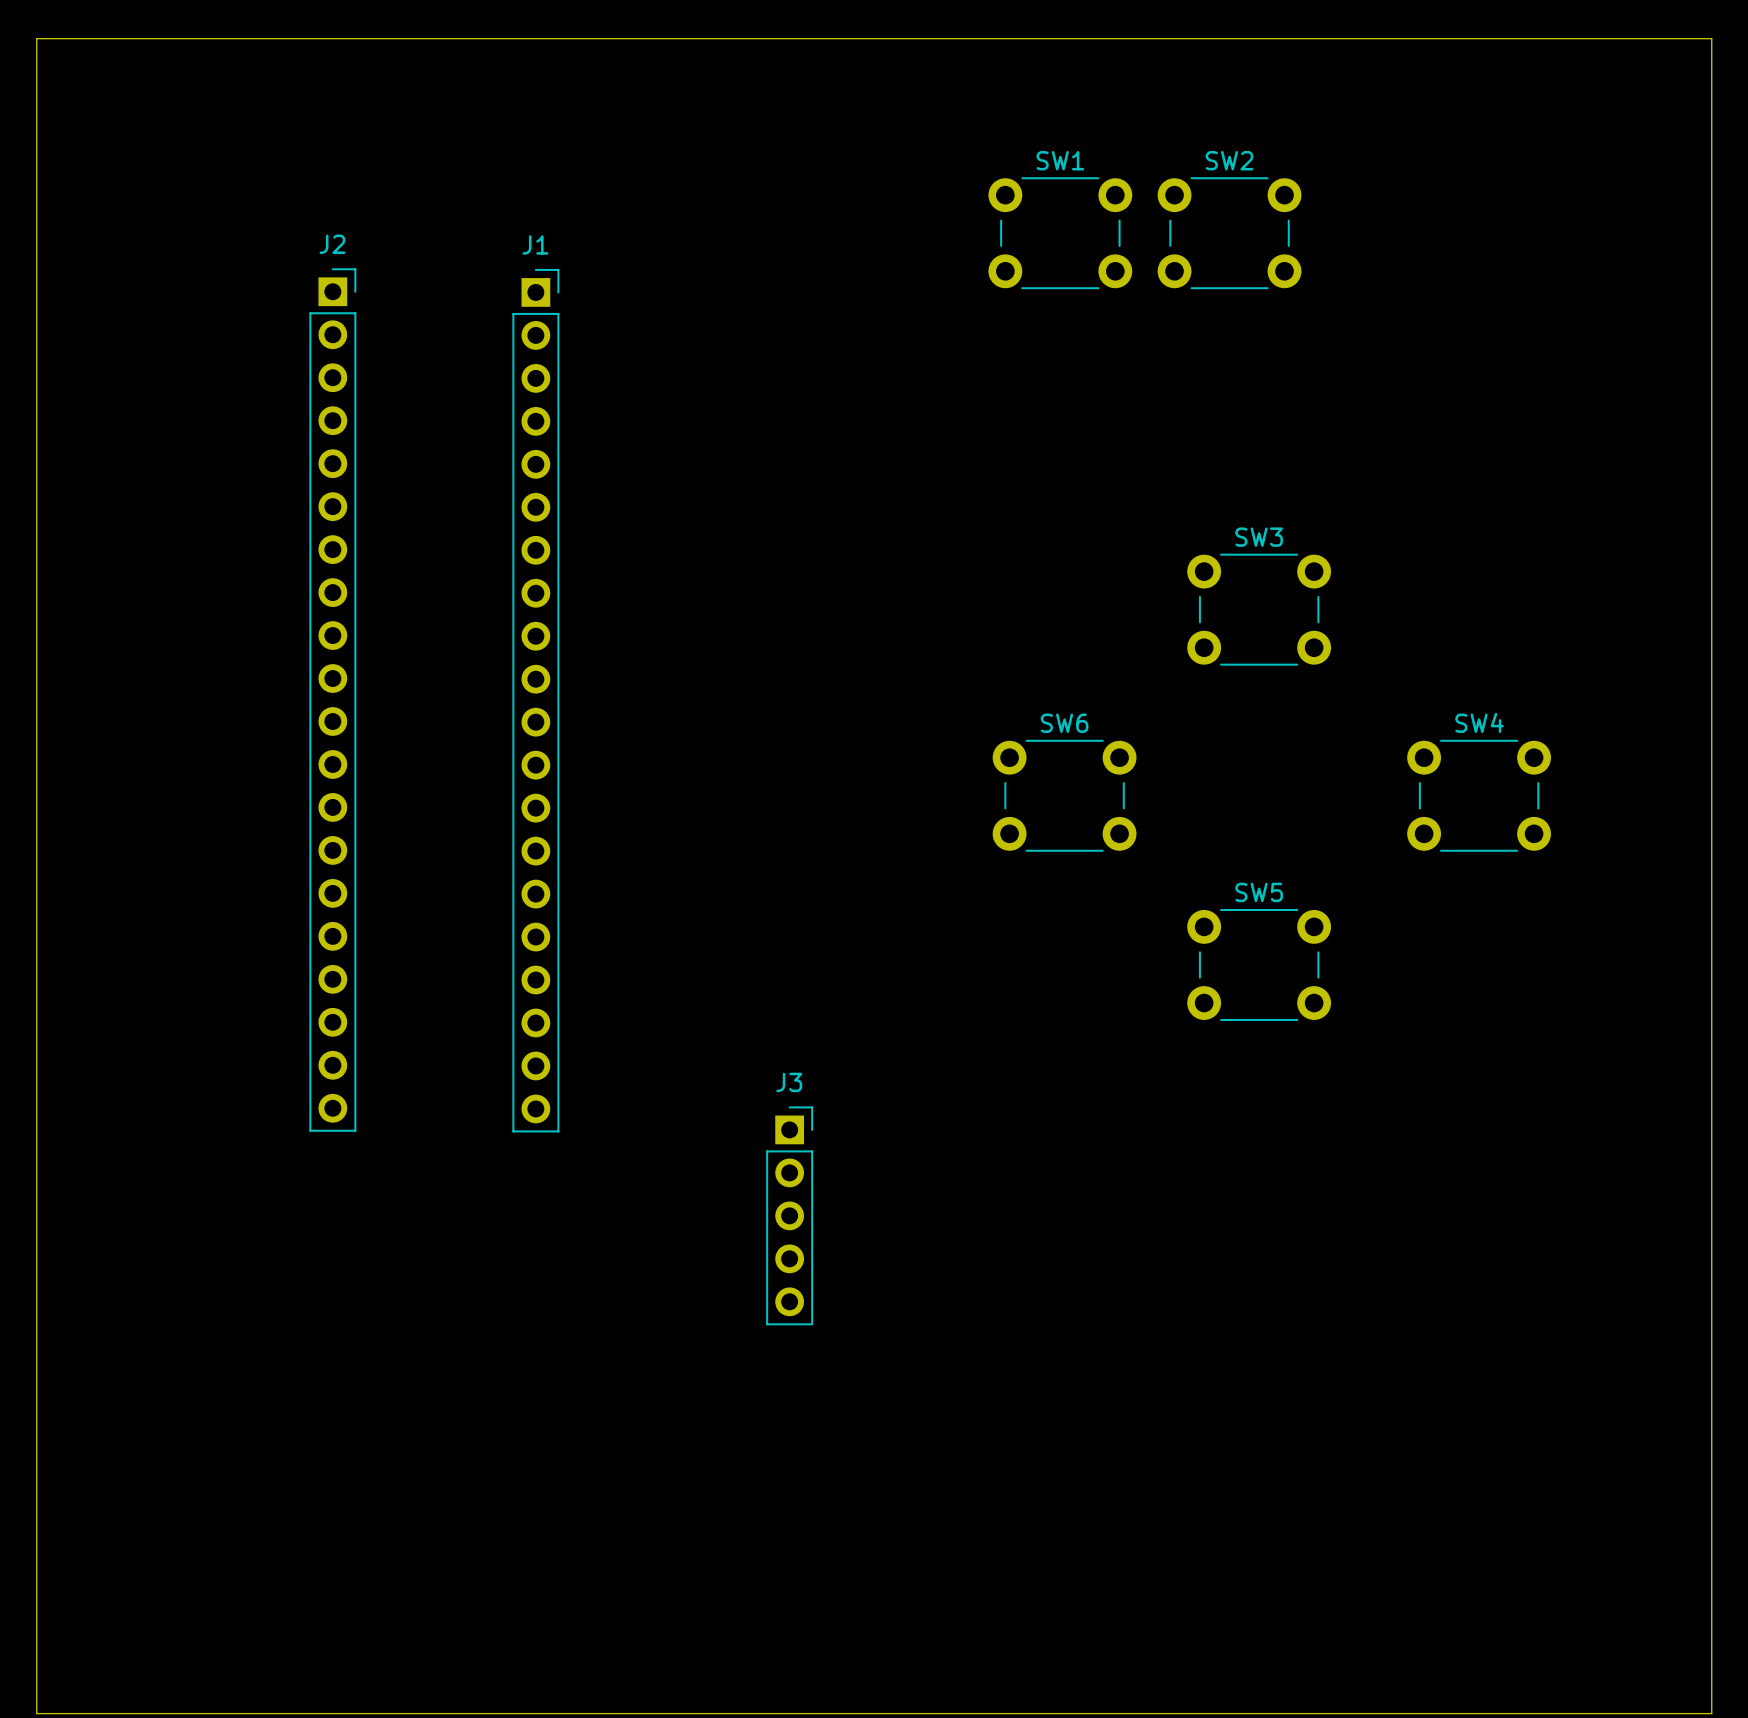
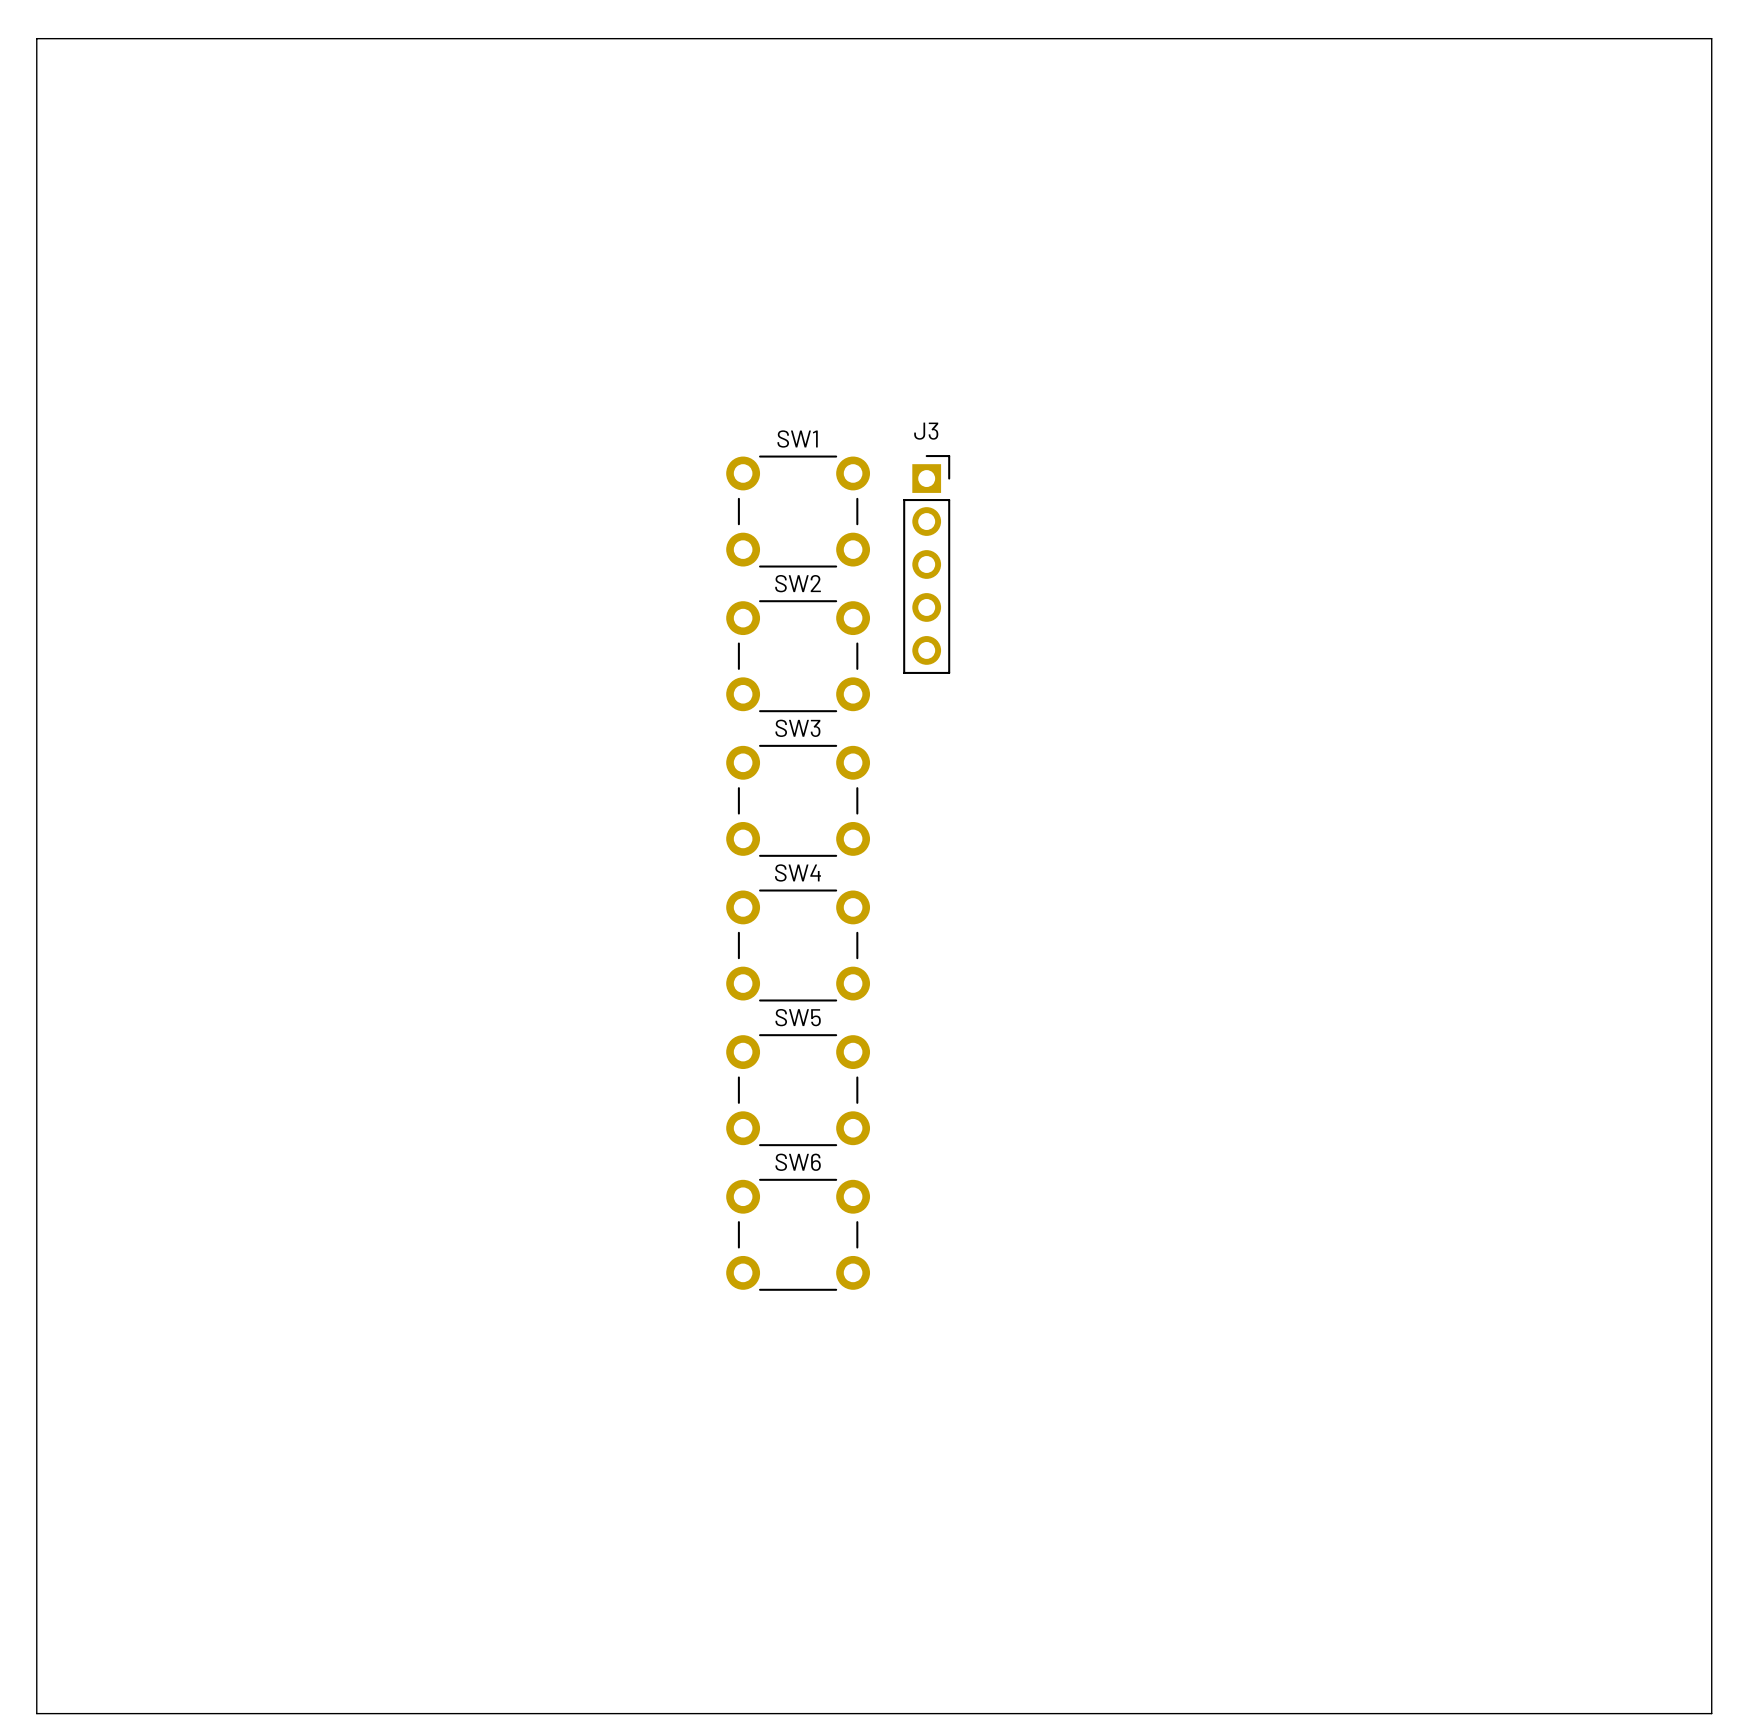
SW1 position: (1060, 233) -> (798, 511)
SW2 position: (1229, 233) -> (798, 656)
SW3 position: (1259, 609) -> (798, 800)
J2: (332, 700) -> none
J1: (535, 700) -> none
SW6 position: (1064, 795) -> (798, 1234)
SW4 position: (1479, 795) -> (798, 945)
SW5 position: (1259, 964) -> (798, 1090)
J3 position: (789, 1215) -> (926, 564)

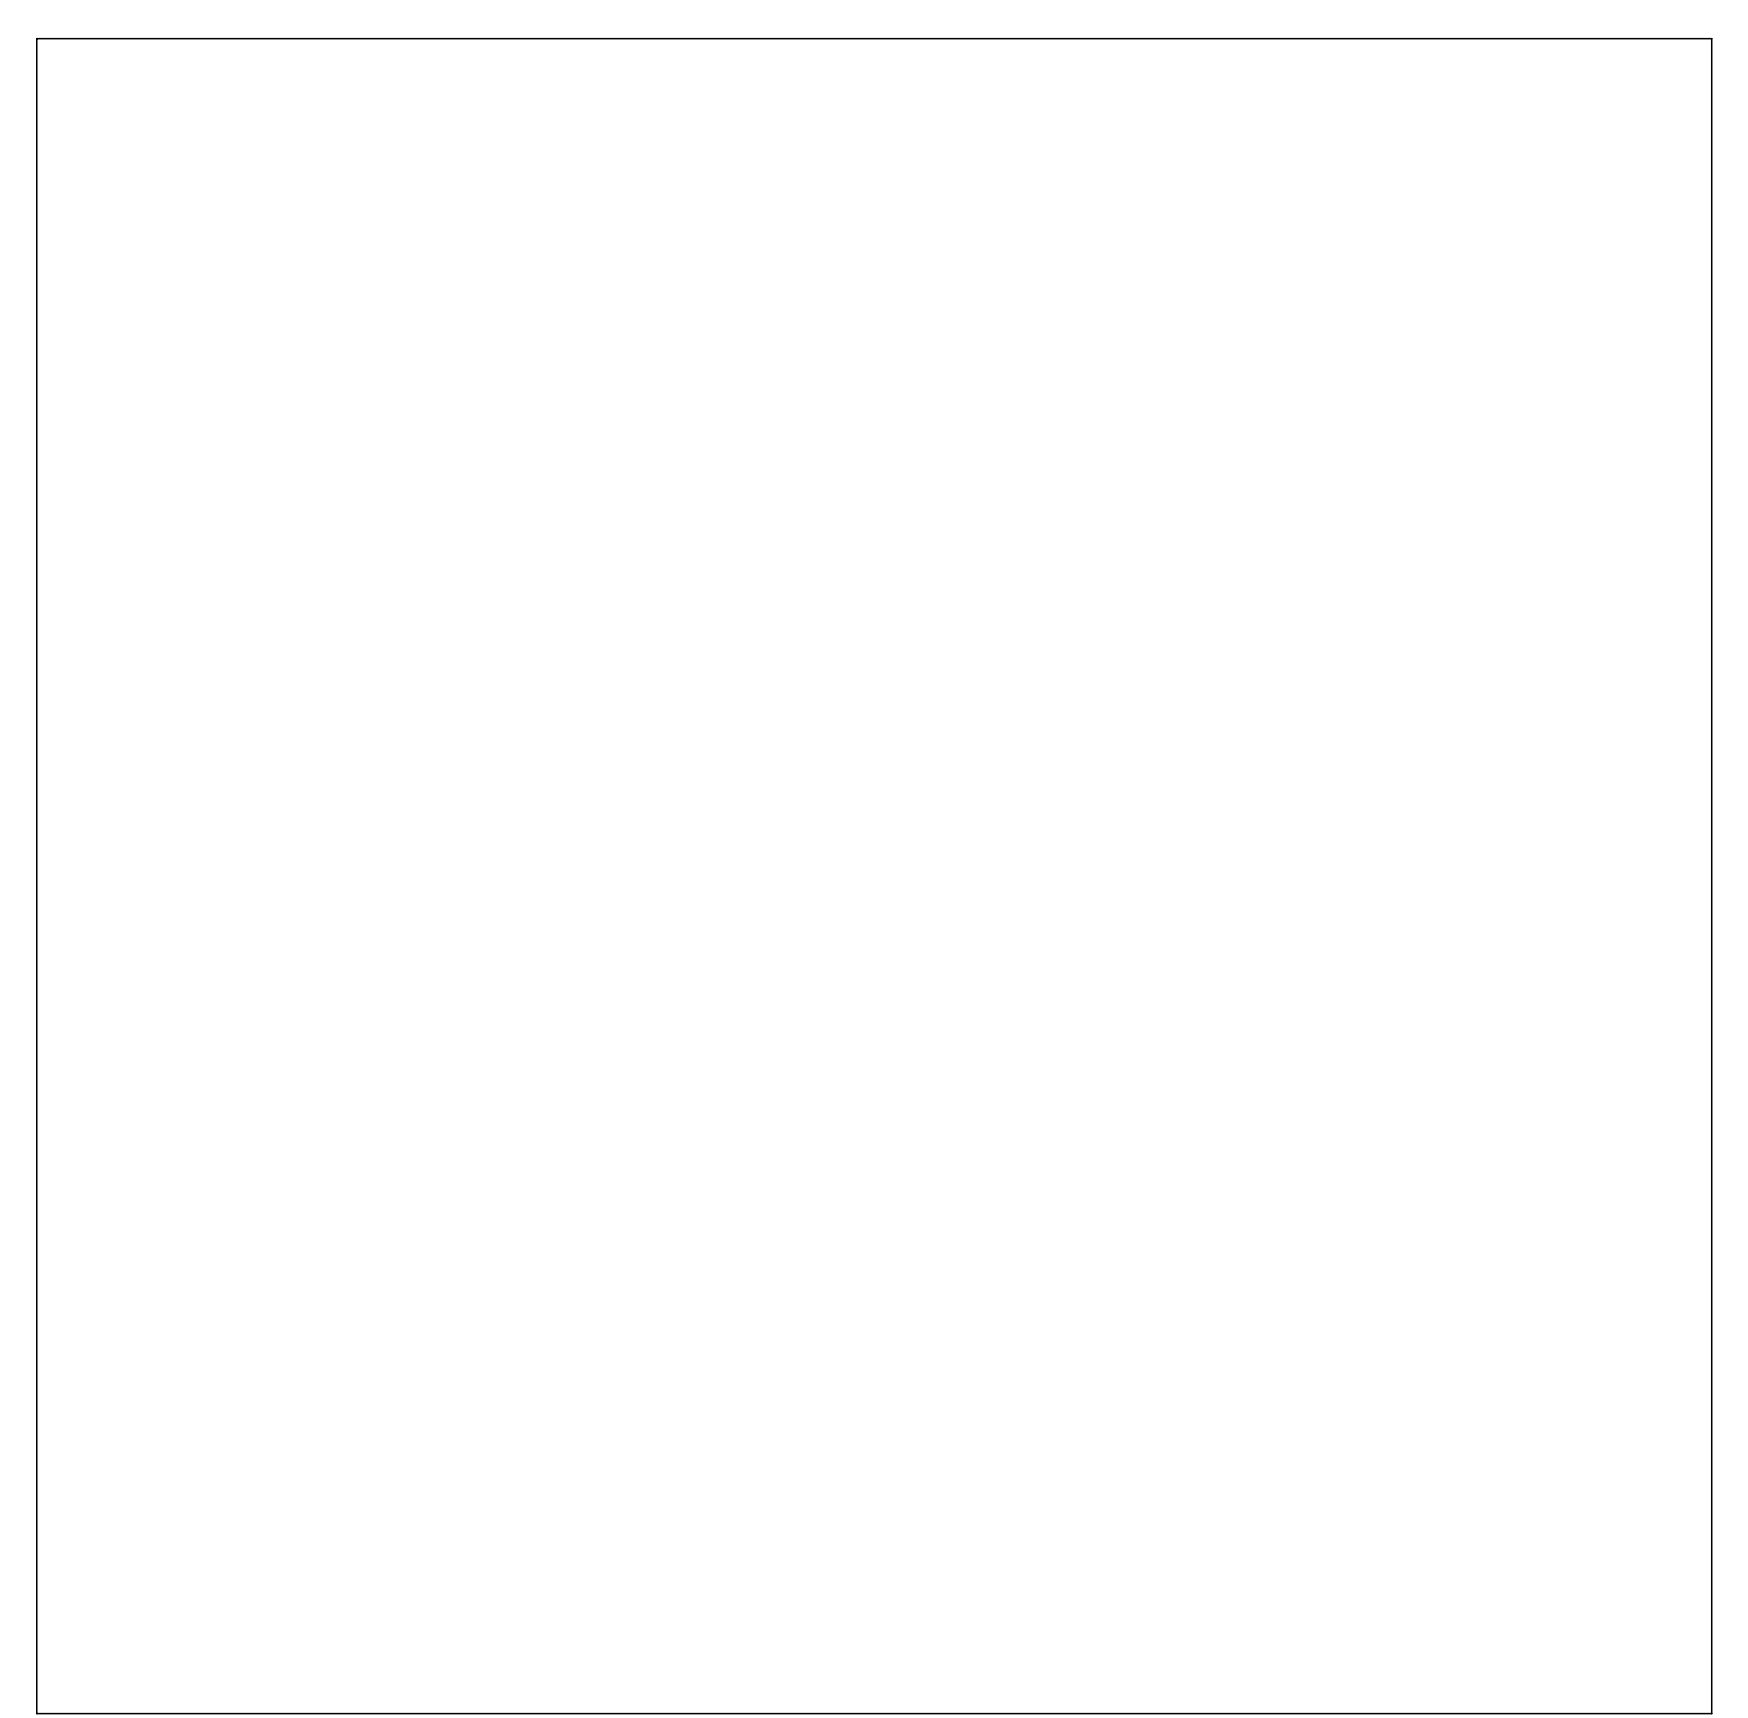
SW1: (798, 511) -> none
J3: (926, 564) -> none
SW2: (798, 656) -> none
SW3: (798, 800) -> none
SW4: (798, 945) -> none
SW5: (798, 1090) -> none
SW6: (798, 1234) -> none

